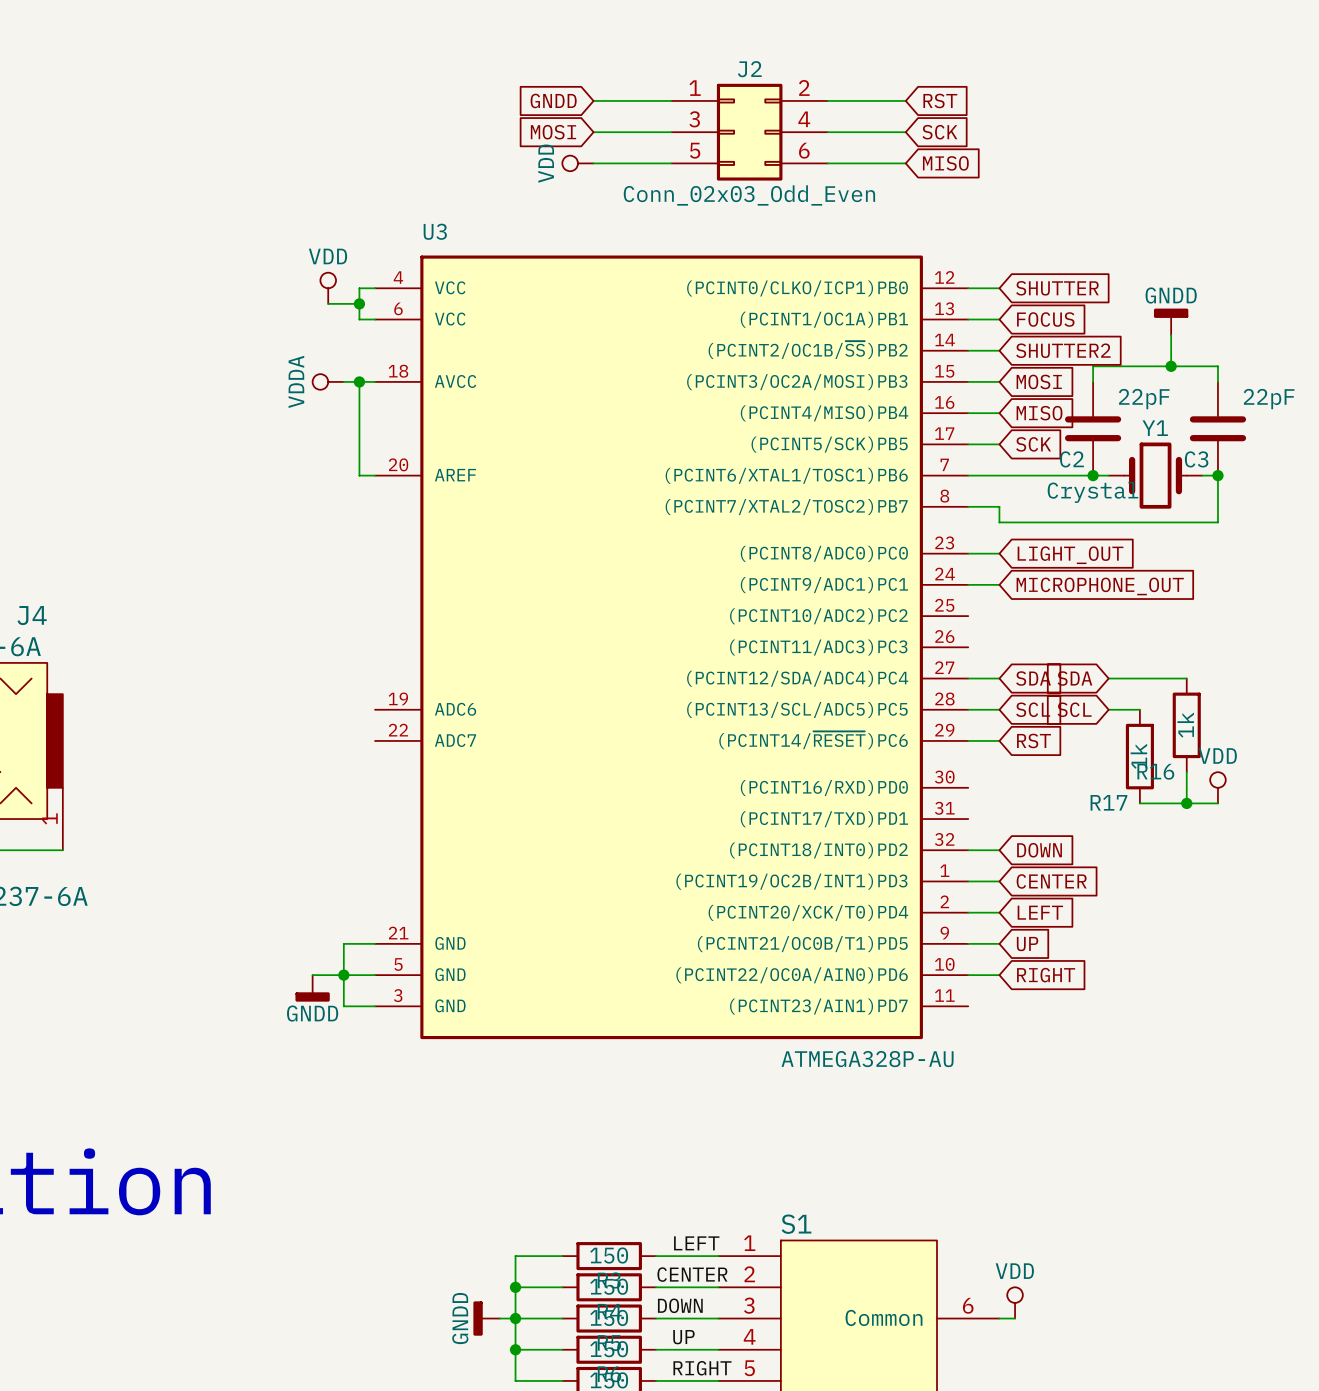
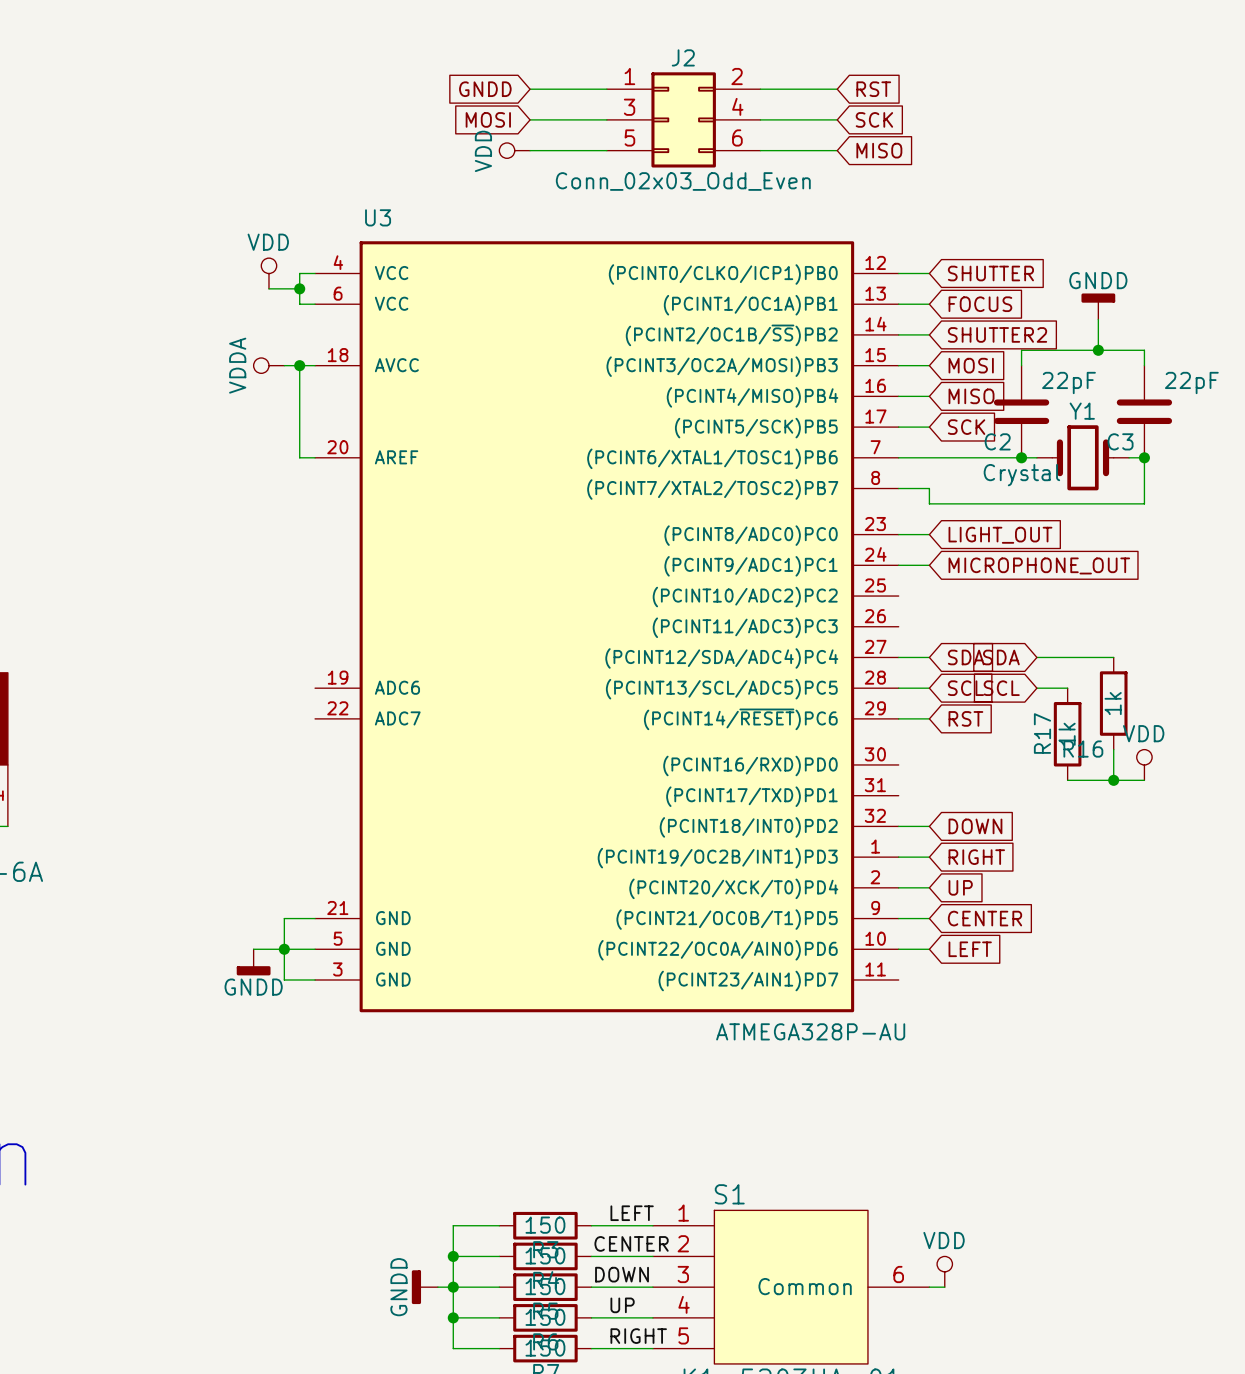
R17 name rotation: 0° (1108, 802) -> 90° counterclockwise (1042, 733)
global label: CENTER (1051, 881) -> RIGHT (976, 857)
global label: LEFT (1040, 912) -> UP (960, 887)
global label: UP (1027, 944) -> CENTER (985, 918)
global label: RIGHT (1046, 975) -> LEFT (970, 949)

